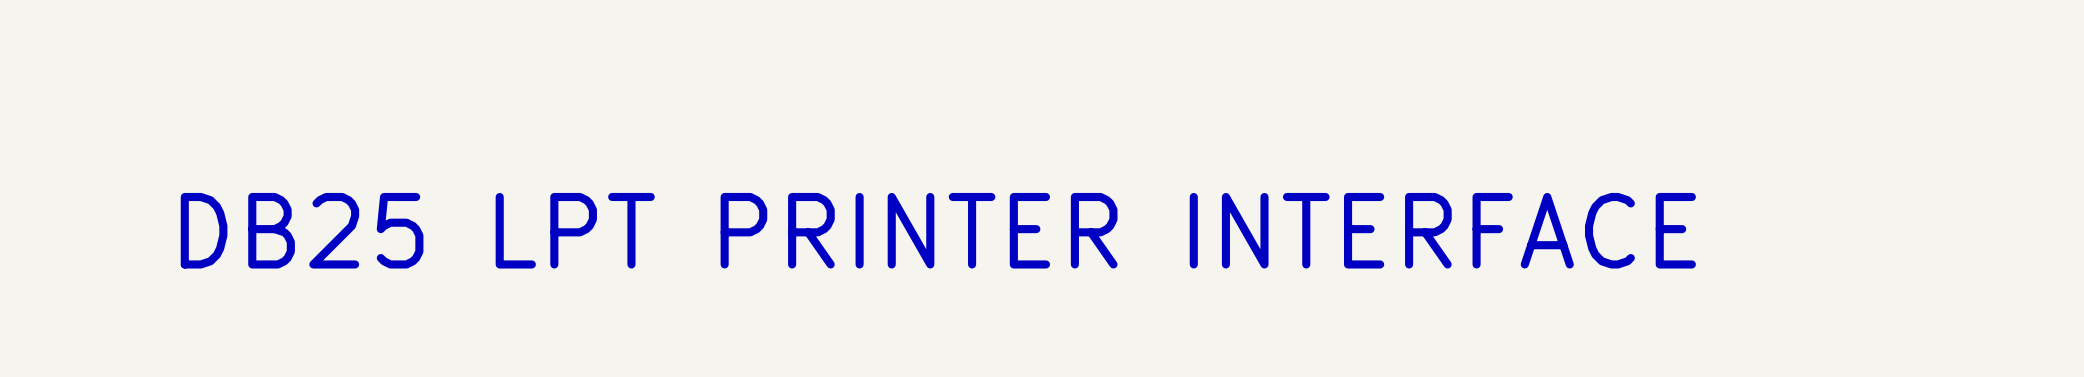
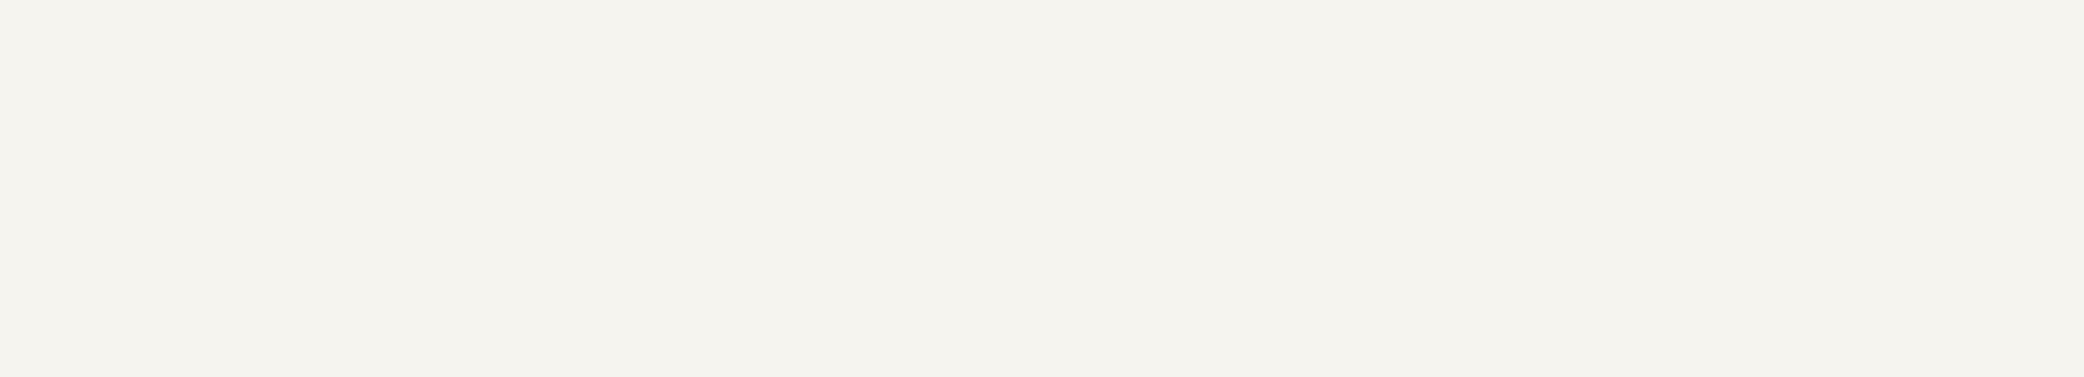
text: DB25 LPT PRINTER INTERFACE (938, 230) -> none

